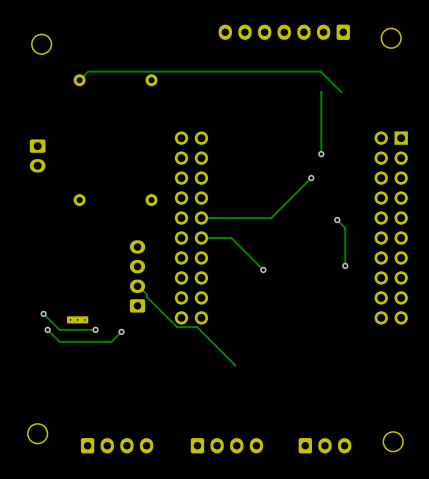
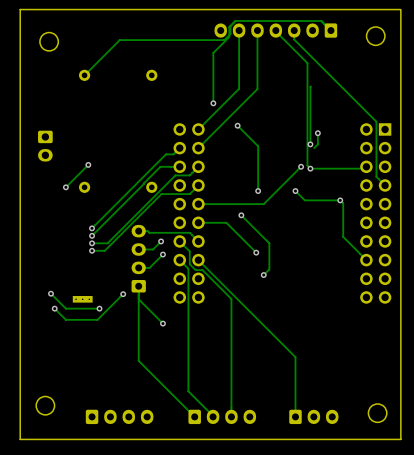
board edge: none -> (400, 9) (20, 9) (20, 439) (400, 439)
board edge: none -> (400, 9) (400, 439)
track: none -> (239, 30) (239, 88) (198, 129)
track: none -> (257, 30) (257, 89) (198, 148)
track: none -> (275, 30) (307, 63) (307, 165) (310, 168) (364, 168) (366, 166)
track: none -> (294, 30) (294, 39) (376, 121) (376, 176) (385, 185)
track: none -> (330, 30) (321, 20) (235, 20) (229, 27) (229, 36) (213, 52) (213, 103)
track: (88, 71) (320, 71) (341, 92) -> (92, 67) (119, 40) (224, 40) (230, 33) (230, 26)
via: none -> (213, 103)
track: none -> (237, 125) (258, 146) (258, 191)
via: none -> (237, 125)
track: none -> (317, 133) (317, 144) (314, 148)
via: none -> (317, 133)
track: none -> (179, 148) (173, 154) (165, 154) (92, 228)
track: none -> (88, 164) (65, 187)
via: none -> (88, 164)
track: none -> (179, 166) (160, 166) (92, 235)
track: none -> (198, 166) (189, 175) (175, 175) (107, 243) (92, 243)
via: none -> (310, 168)
track: none -> (198, 185) (189, 194) (161, 194) (104, 250) (92, 250)
via: none -> (65, 187)
via: none -> (258, 191)
track: none -> (295, 191) (304, 200) (340, 200) (343, 203) (343, 236) (366, 260)
via: none -> (295, 191)
track: (337, 220) (345, 228) (345, 265) -> none
via position: (337, 220) -> (340, 200)
track: none -> (241, 215) (269, 243) (269, 269) (263, 275)
via: none -> (241, 215)
via: none -> (92, 228)
track: none -> (138, 231) (189, 232) (198, 241)
via: none -> (92, 235)
track: none -> (161, 241) (153, 249) (138, 249)
via: none -> (161, 241)
track: none -> (179, 241) (189, 251) (189, 264) (195, 270) (202, 270) (231, 299) (231, 416)
via: none -> (92, 243)
via: (345, 265) -> none
via: none -> (92, 250)
via: none -> (162, 254)
track: none -> (179, 260) (188, 268) (188, 391) (213, 416)
track: none -> (198, 260) (295, 357) (295, 416)
track: (138, 286) (177, 327) (197, 327) (234, 365) -> (139, 267) (149, 267) (162, 254)
via: none -> (263, 275)
track: none -> (138, 286) (138, 360) (194, 416)
track: none -> (138, 299) (162, 323)
track: (121, 331) (111, 341) (93, 341) -> (123, 294) (97, 319)
via position: (121, 331) -> (123, 294)
via: none -> (162, 323)

